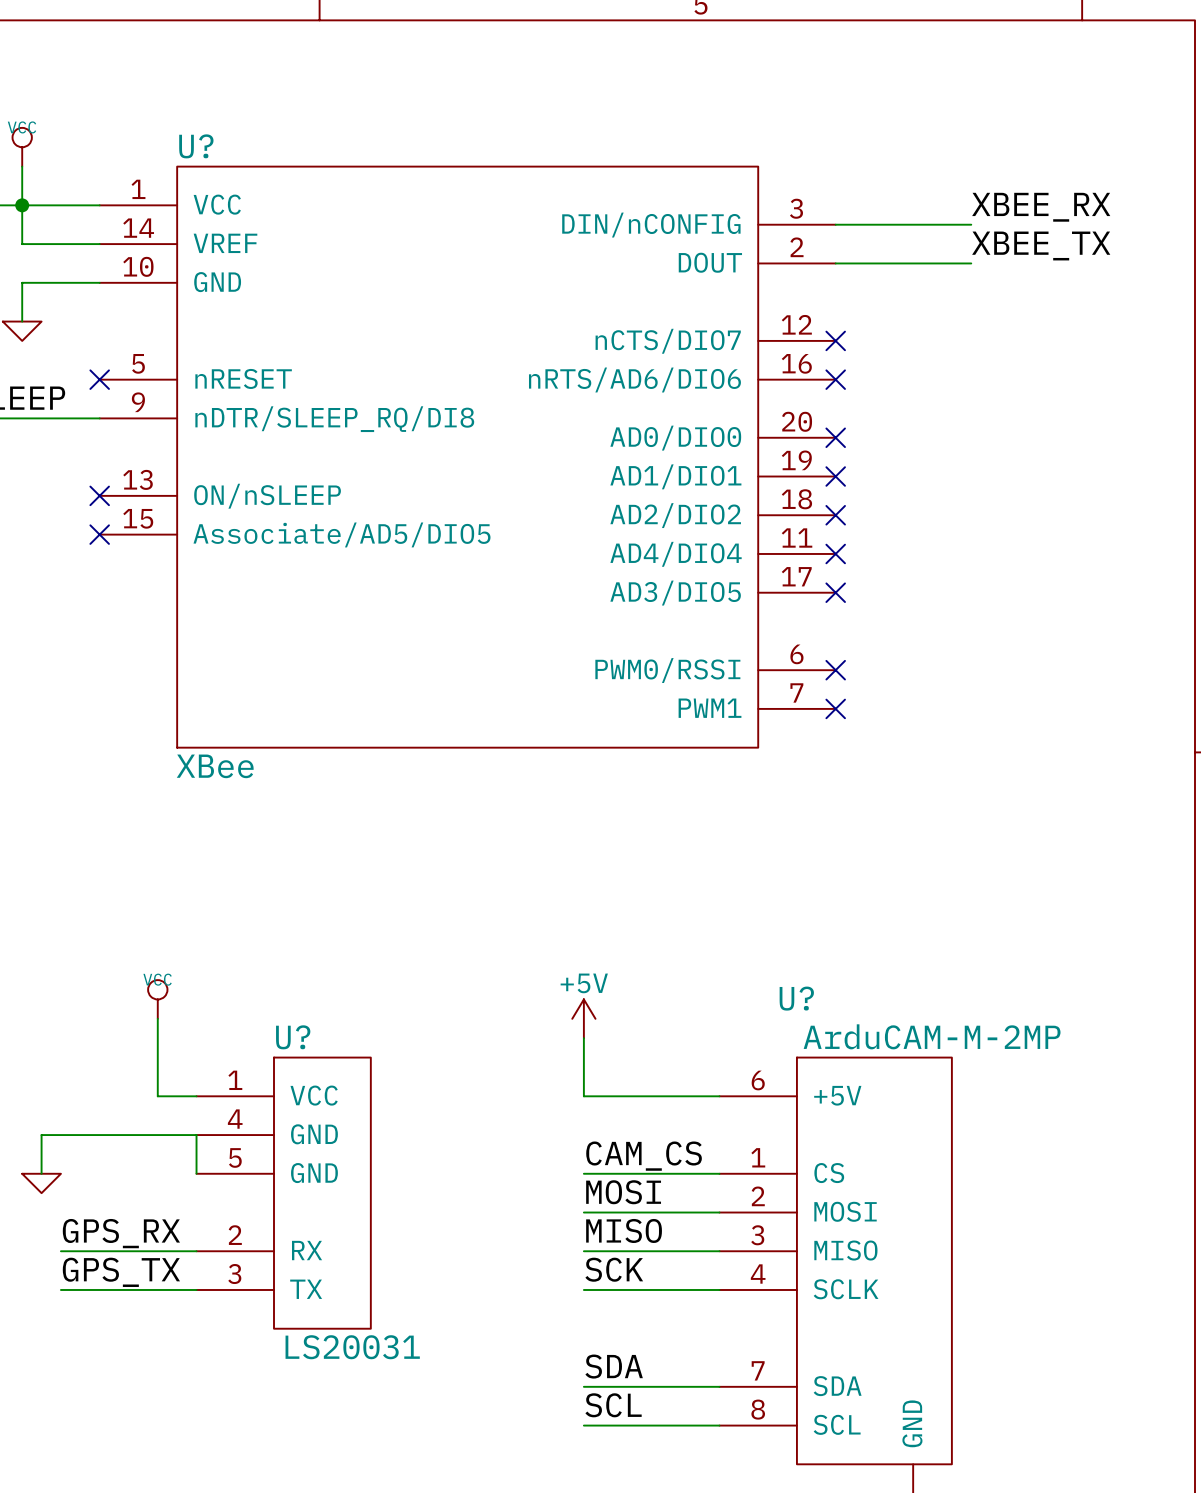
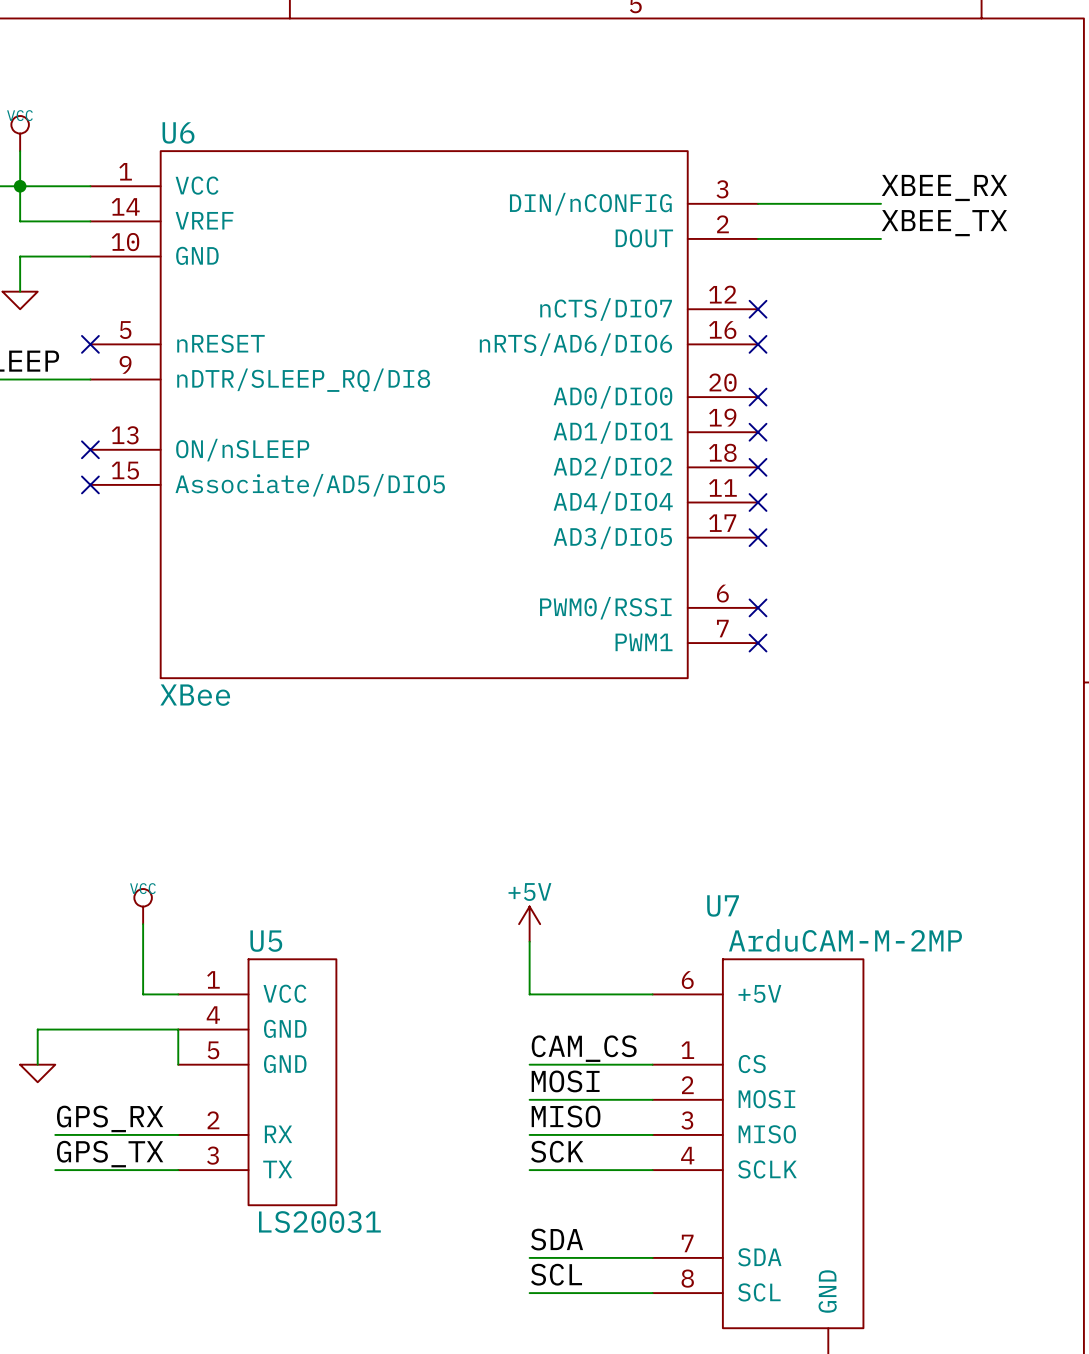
U? name: U? (196, 146) -> U6 (178, 132)
U? name: U? (796, 998) -> U7 (723, 905)
U? name: U? (293, 1037) -> U5 (266, 941)

